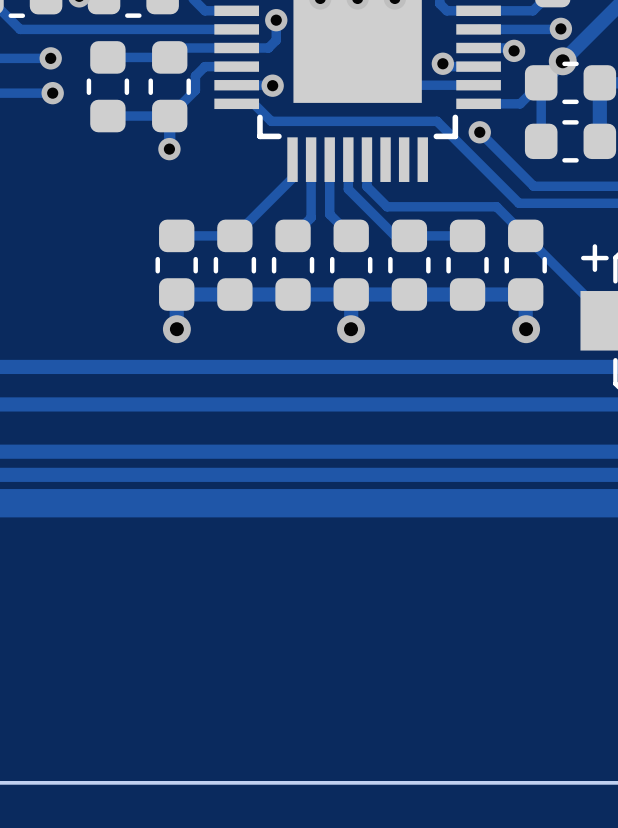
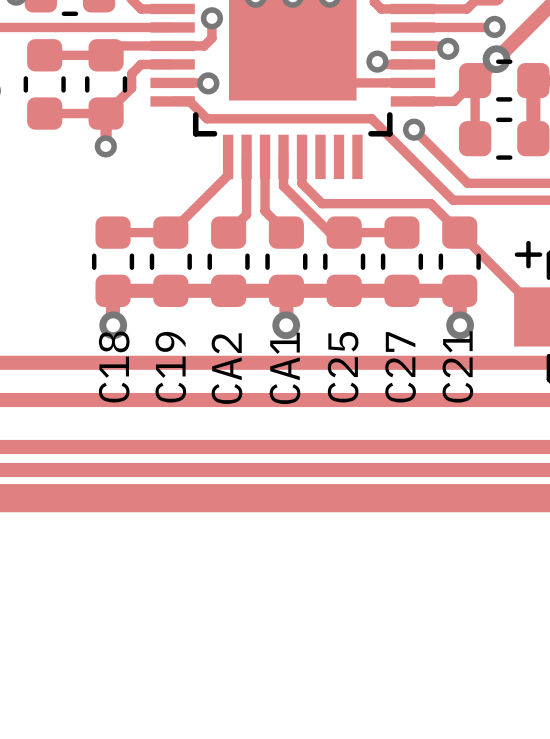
C18 name: none -> C18 (114, 367)
C19 name: none -> C19 (170, 367)
C27 name: none -> C27 (400, 367)
C25 name: none -> C25 (343, 367)
C21 name: none -> C21 (457, 366)
CA2 name: none -> CA2 (226, 368)
CA1 name: none -> CA1 (285, 368)

